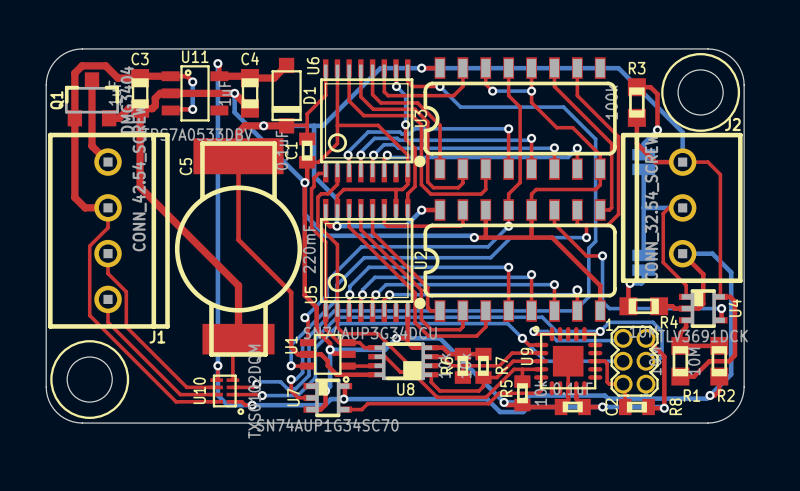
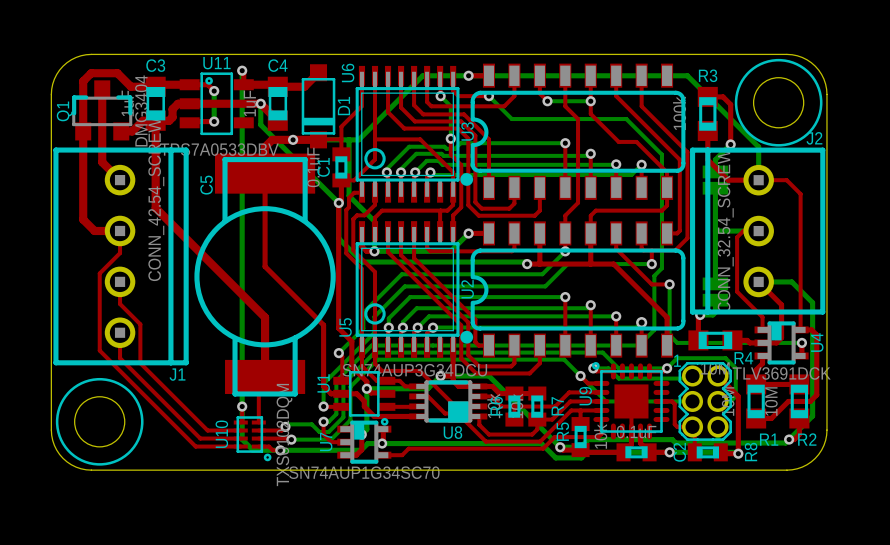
C5 value: 220mF (309, 249) -> none

